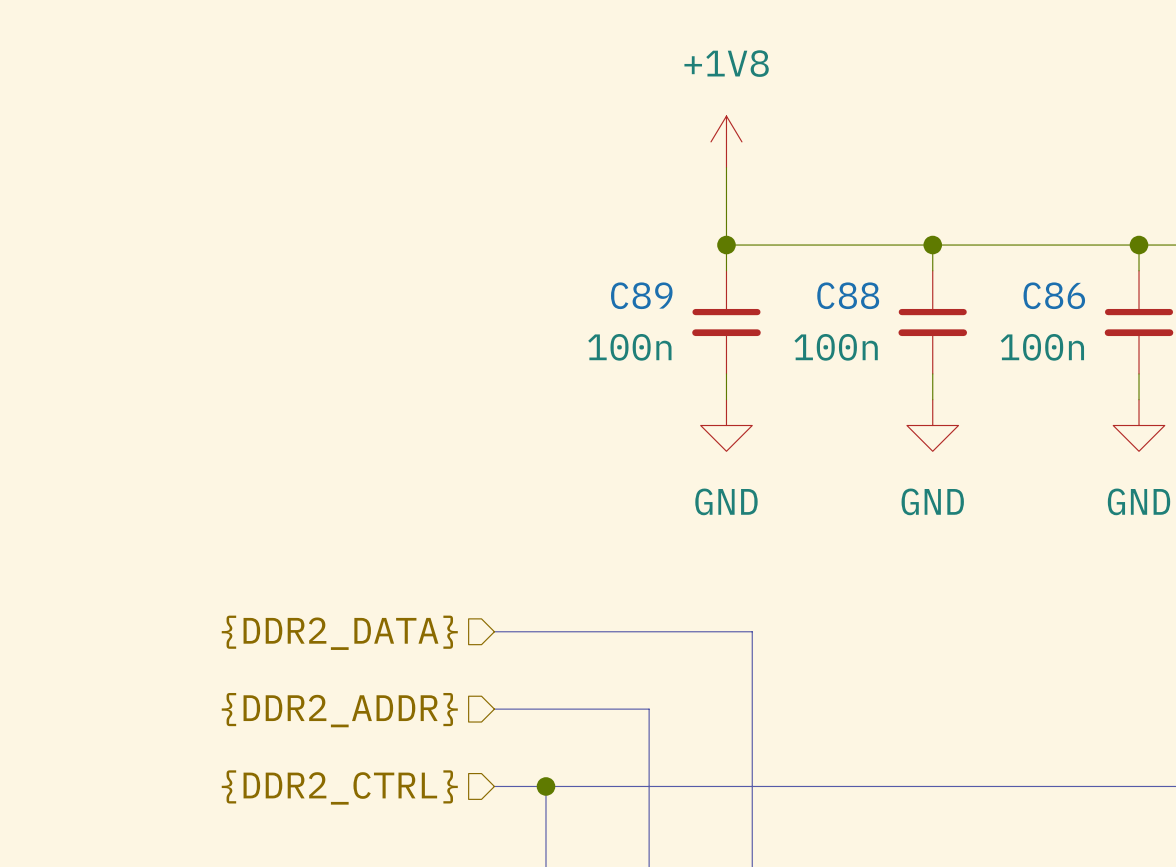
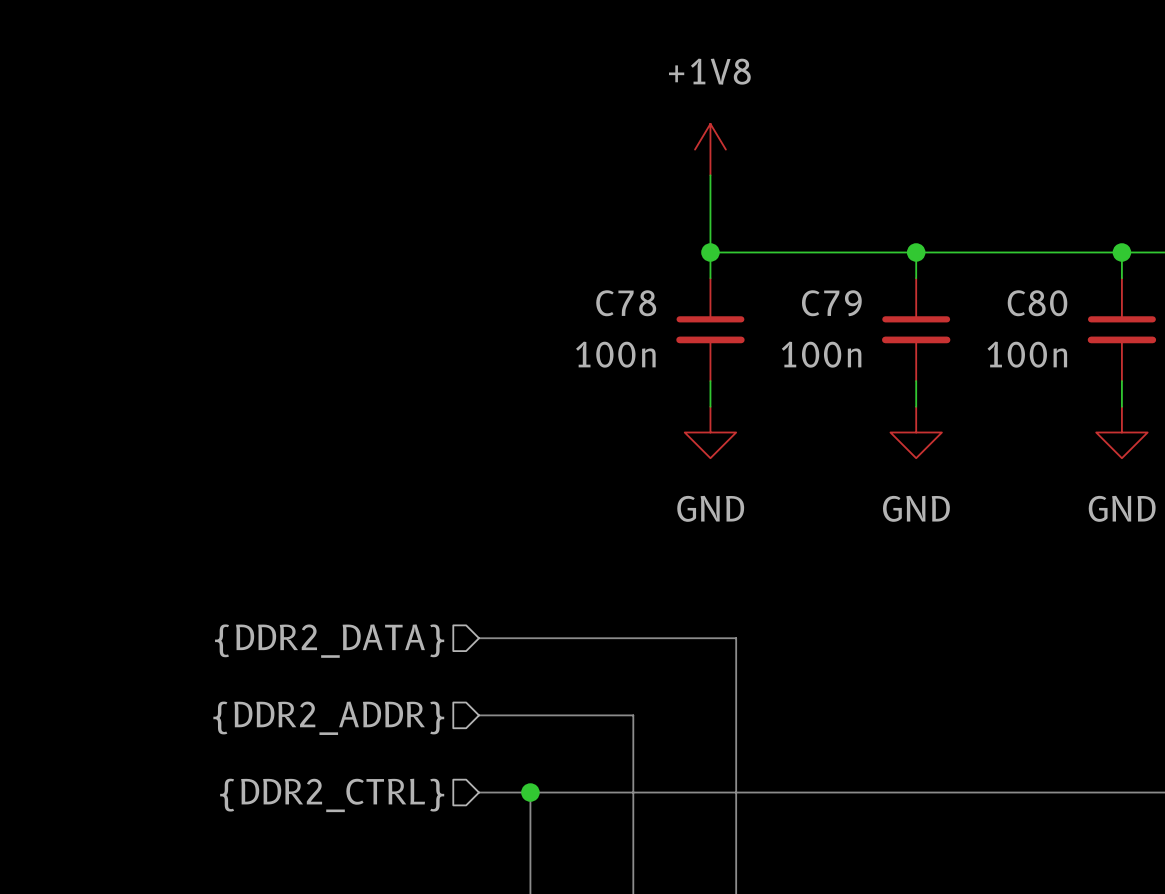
C89 name: C89 (641, 295) -> C78 (626, 303)
C88 name: C88 (848, 295) -> C79 (831, 303)
C86 name: C86 (1054, 295) -> C80 (1037, 303)

